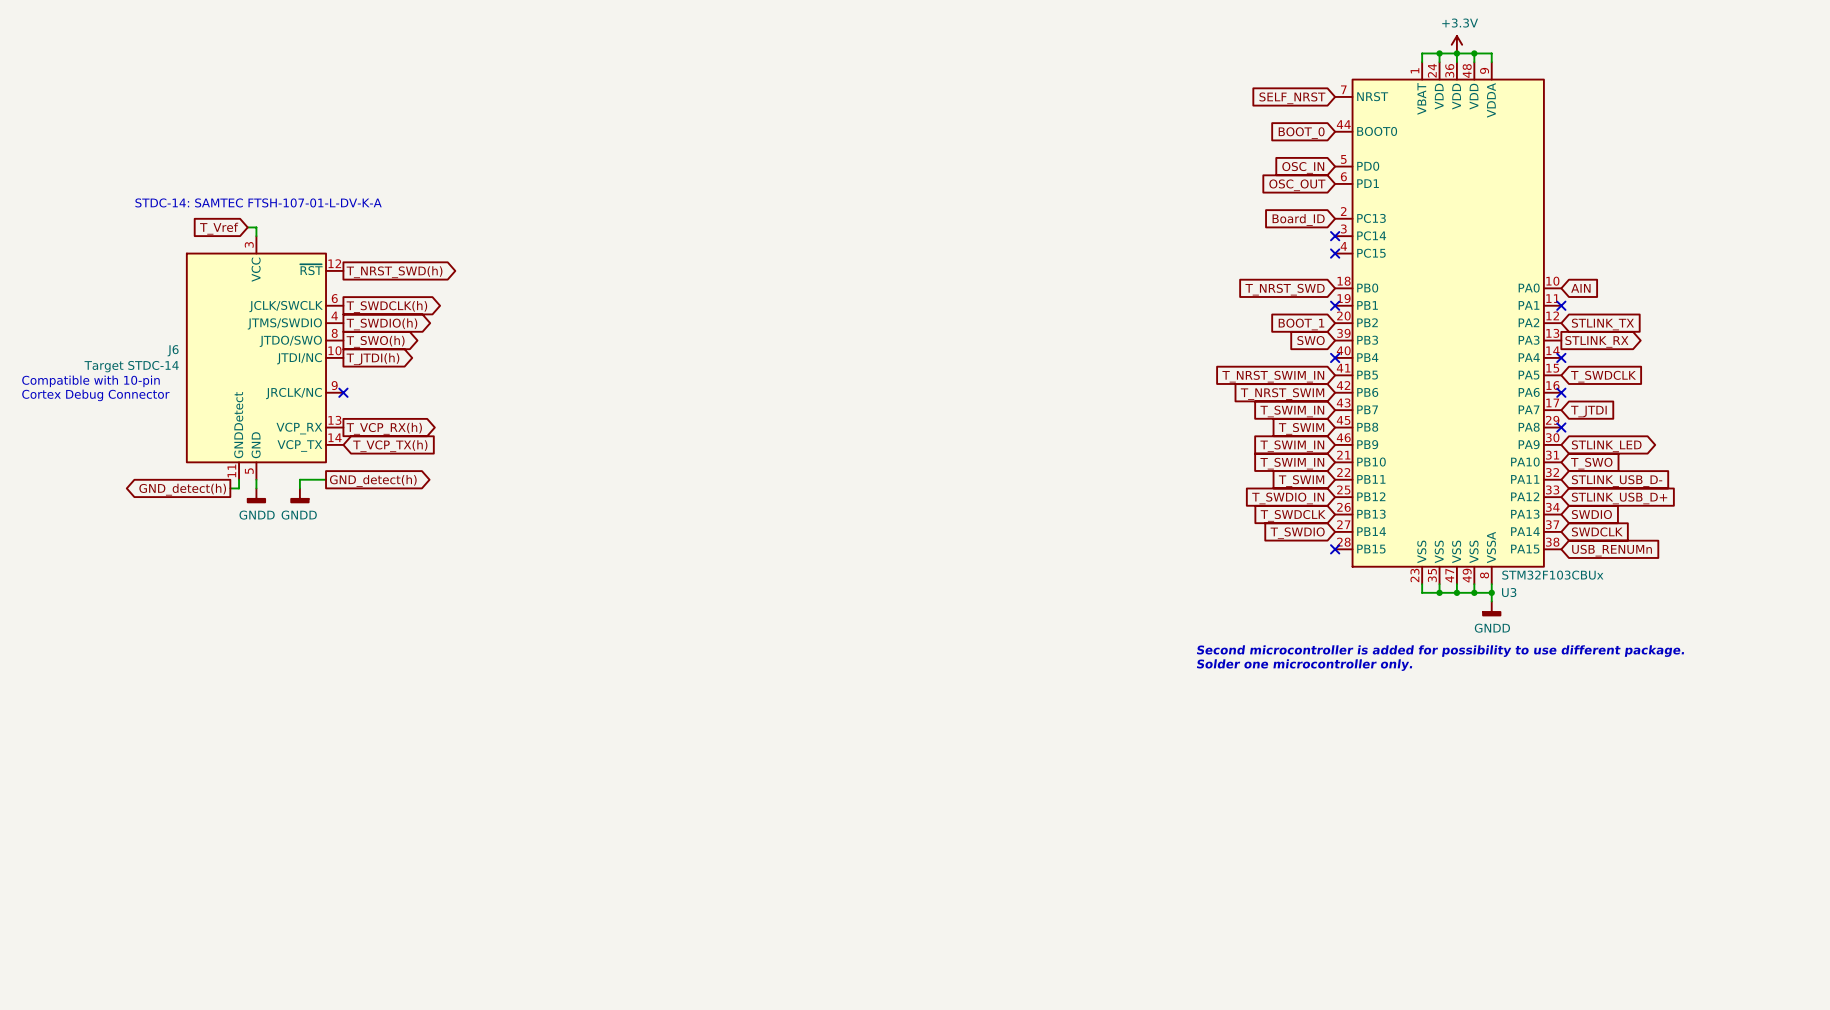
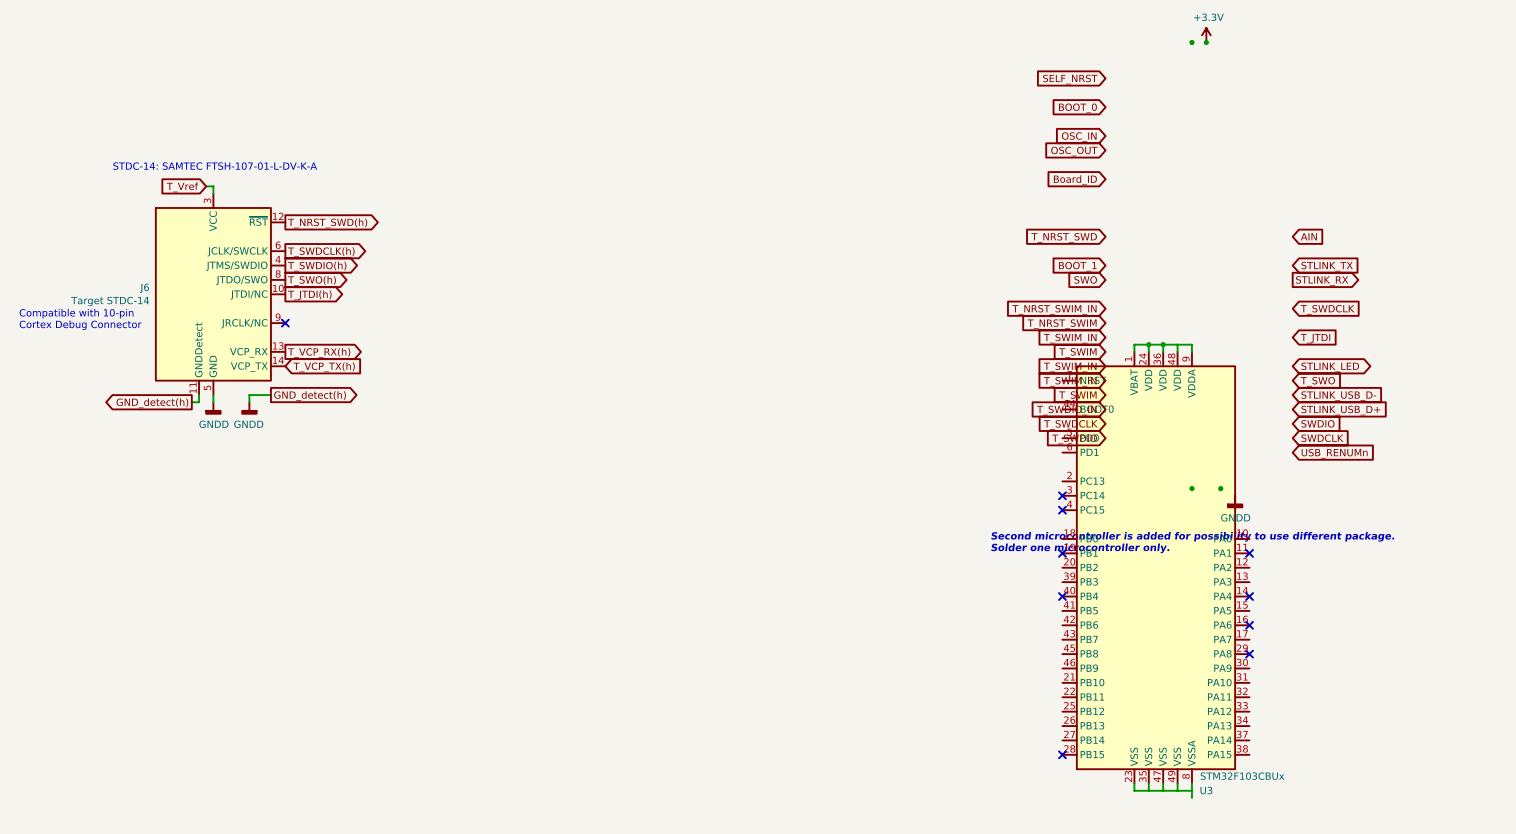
wire: (1439, 53) (1439, 62) -> none
wire: (1456, 53) (1456, 62) -> none
wire: (1474, 53) (1474, 62) -> none
junction: (1474, 53) -> none
wire: (1422, 62) (1422, 53) (1491, 53) (1491, 62) -> none
no-connect mark: (1335, 236) -> none
no-connect mark: (1335, 253) -> none
no-connect mark: (1335, 305) -> none
no-connect mark: (1561, 305) -> none
U3 position: (1448, 323) -> (1155, 567)
no-connect mark: (1335, 357) -> none
no-connect mark: (1561, 357) -> none
no-connect mark: (1561, 392) -> none
junction: none -> (1148, 344)
junction: none -> (1163, 344)
no-connect mark: (1561, 427) -> none
no-connect mark: (1335, 549) -> none
junction: (1456, 592) -> none
junction: (1491, 592) -> none
no-connect mark: none -> (1062, 495)
no-connect mark: none -> (1062, 510)
no-connect mark: none -> (1062, 553)
no-connect mark: none -> (1249, 553)
no-connect mark: none -> (1062, 596)
no-connect mark: none -> (1249, 596)
no-connect mark: none -> (1249, 625)
no-connect mark: none -> (1249, 654)
no-connect mark: none -> (1062, 754)
wire: none -> (1134, 783) (1134, 790) (1191, 790)
wire: none -> (1148, 783) (1148, 790)
wire: none -> (1163, 783) (1163, 790)
wire: none -> (1177, 783) (1177, 790)
wire: none -> (1191, 783) (1191, 798)

